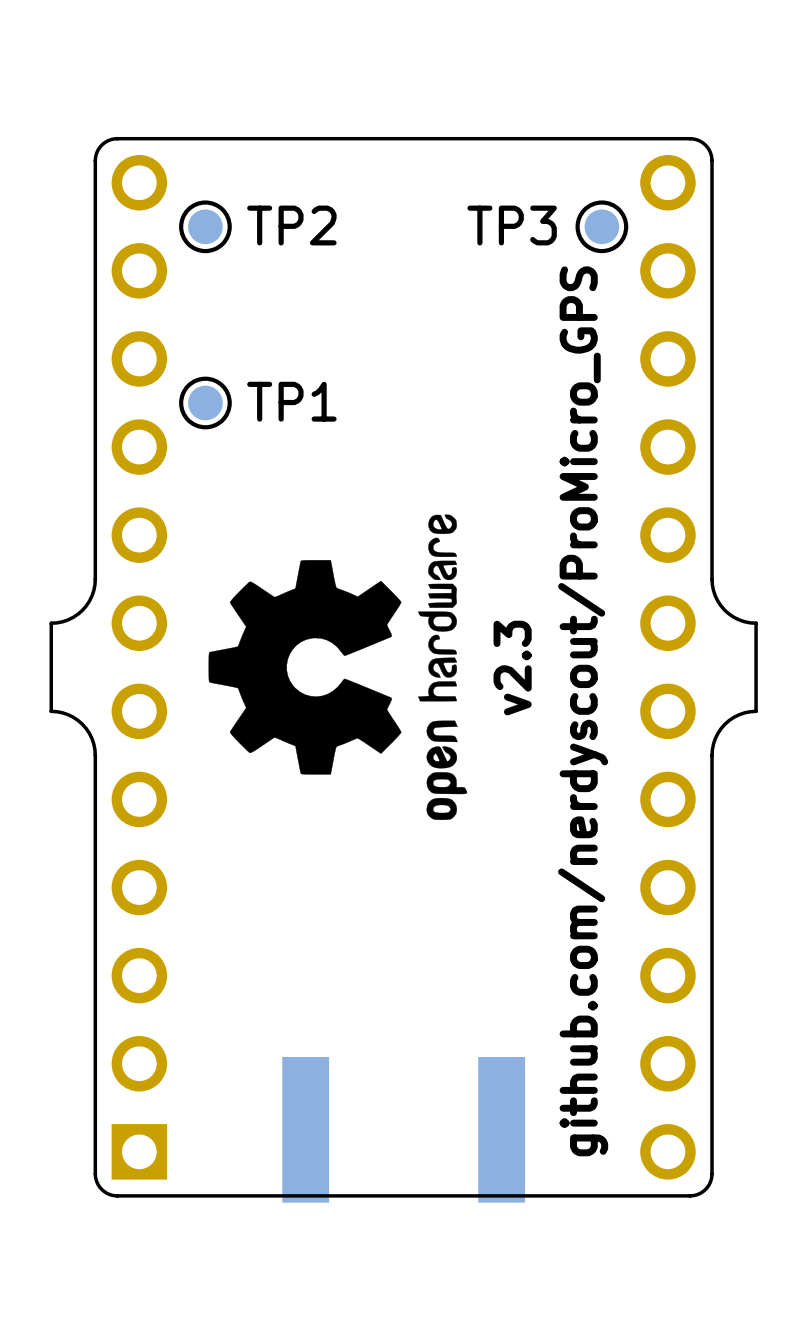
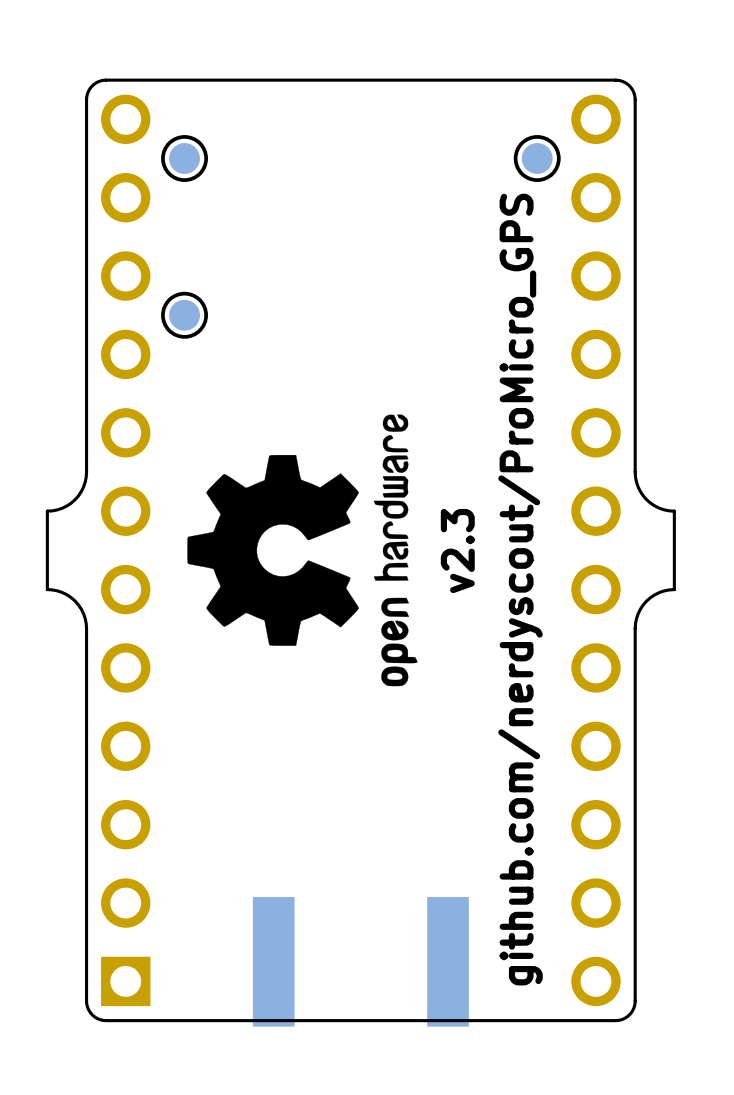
TP2 name: TP2 (291, 225) -> none
TP3 name: TP3 (512, 225) -> none
TP1 name: TP1 (291, 401) -> none

